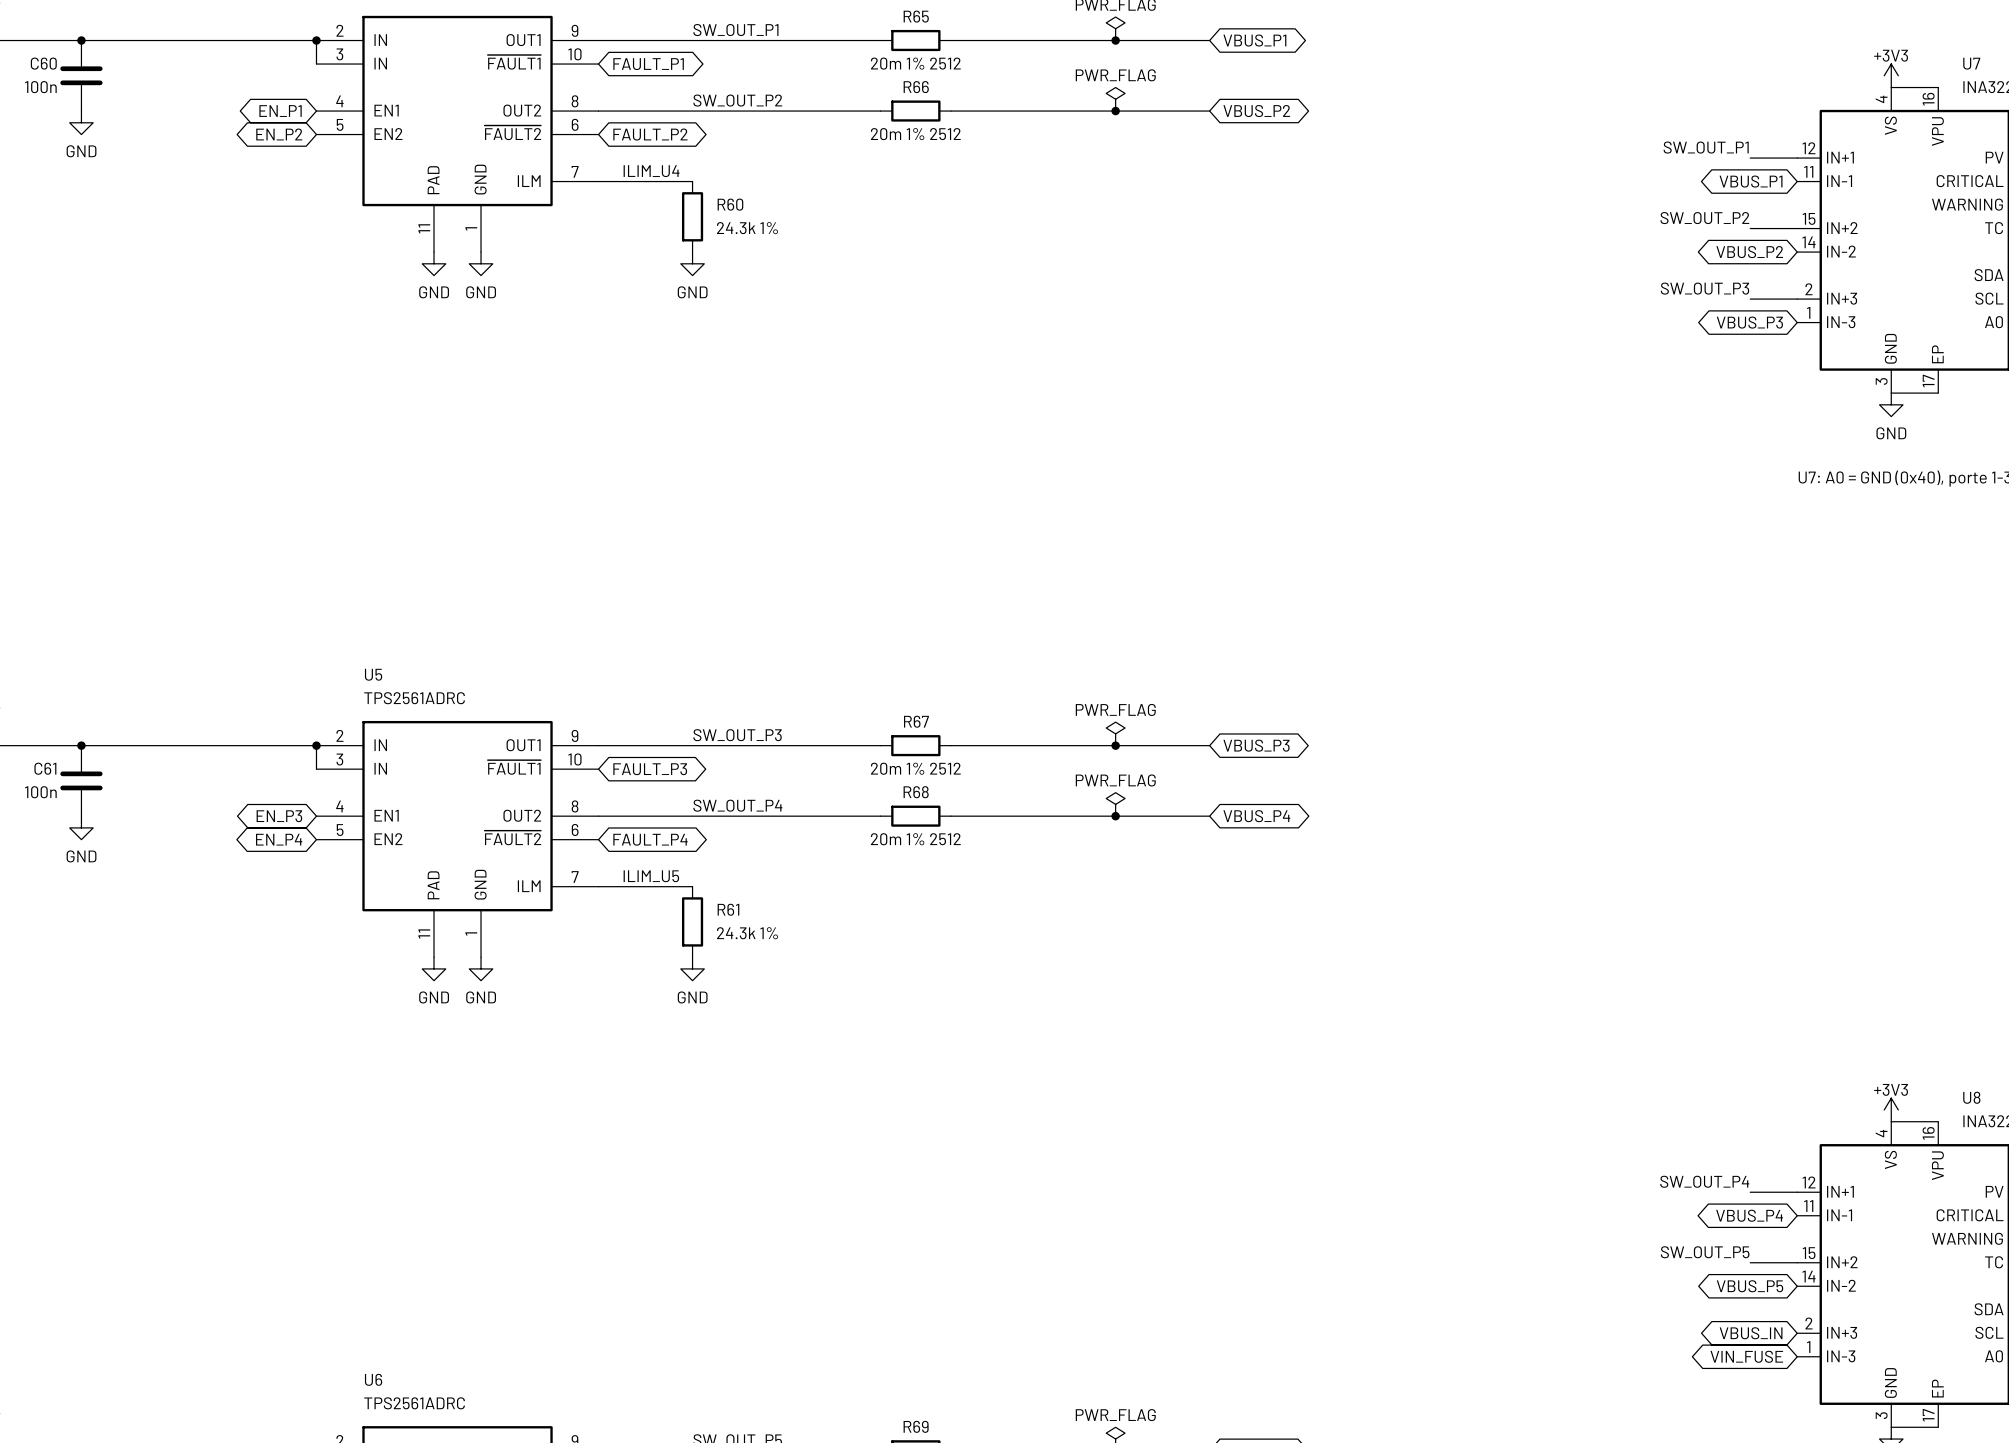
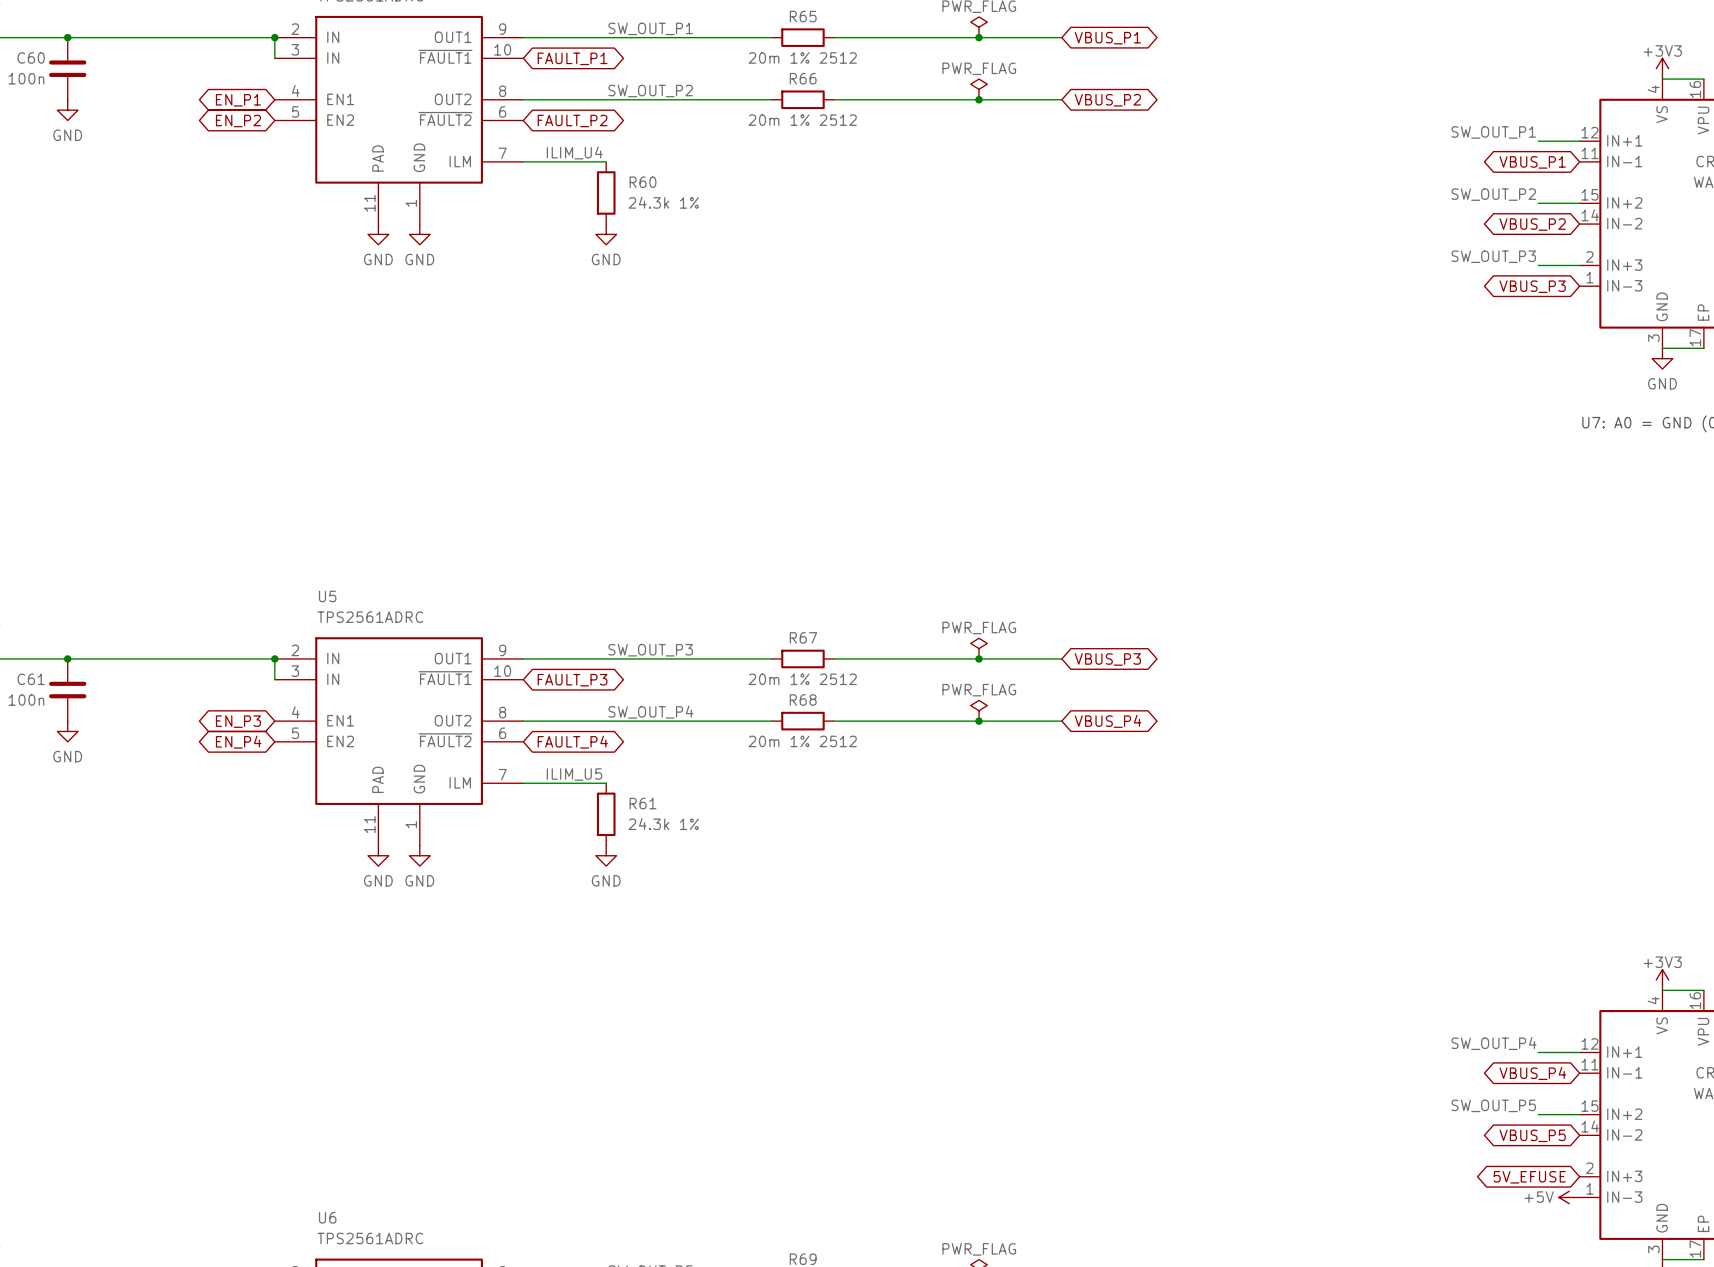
global label: VBUS_IN (1751, 1333) -> 5V_EFUSE (1529, 1177)
global label: VIN_FUSE (1746, 1356) -> none
power symbol: none -> +5V (1569, 1197)

